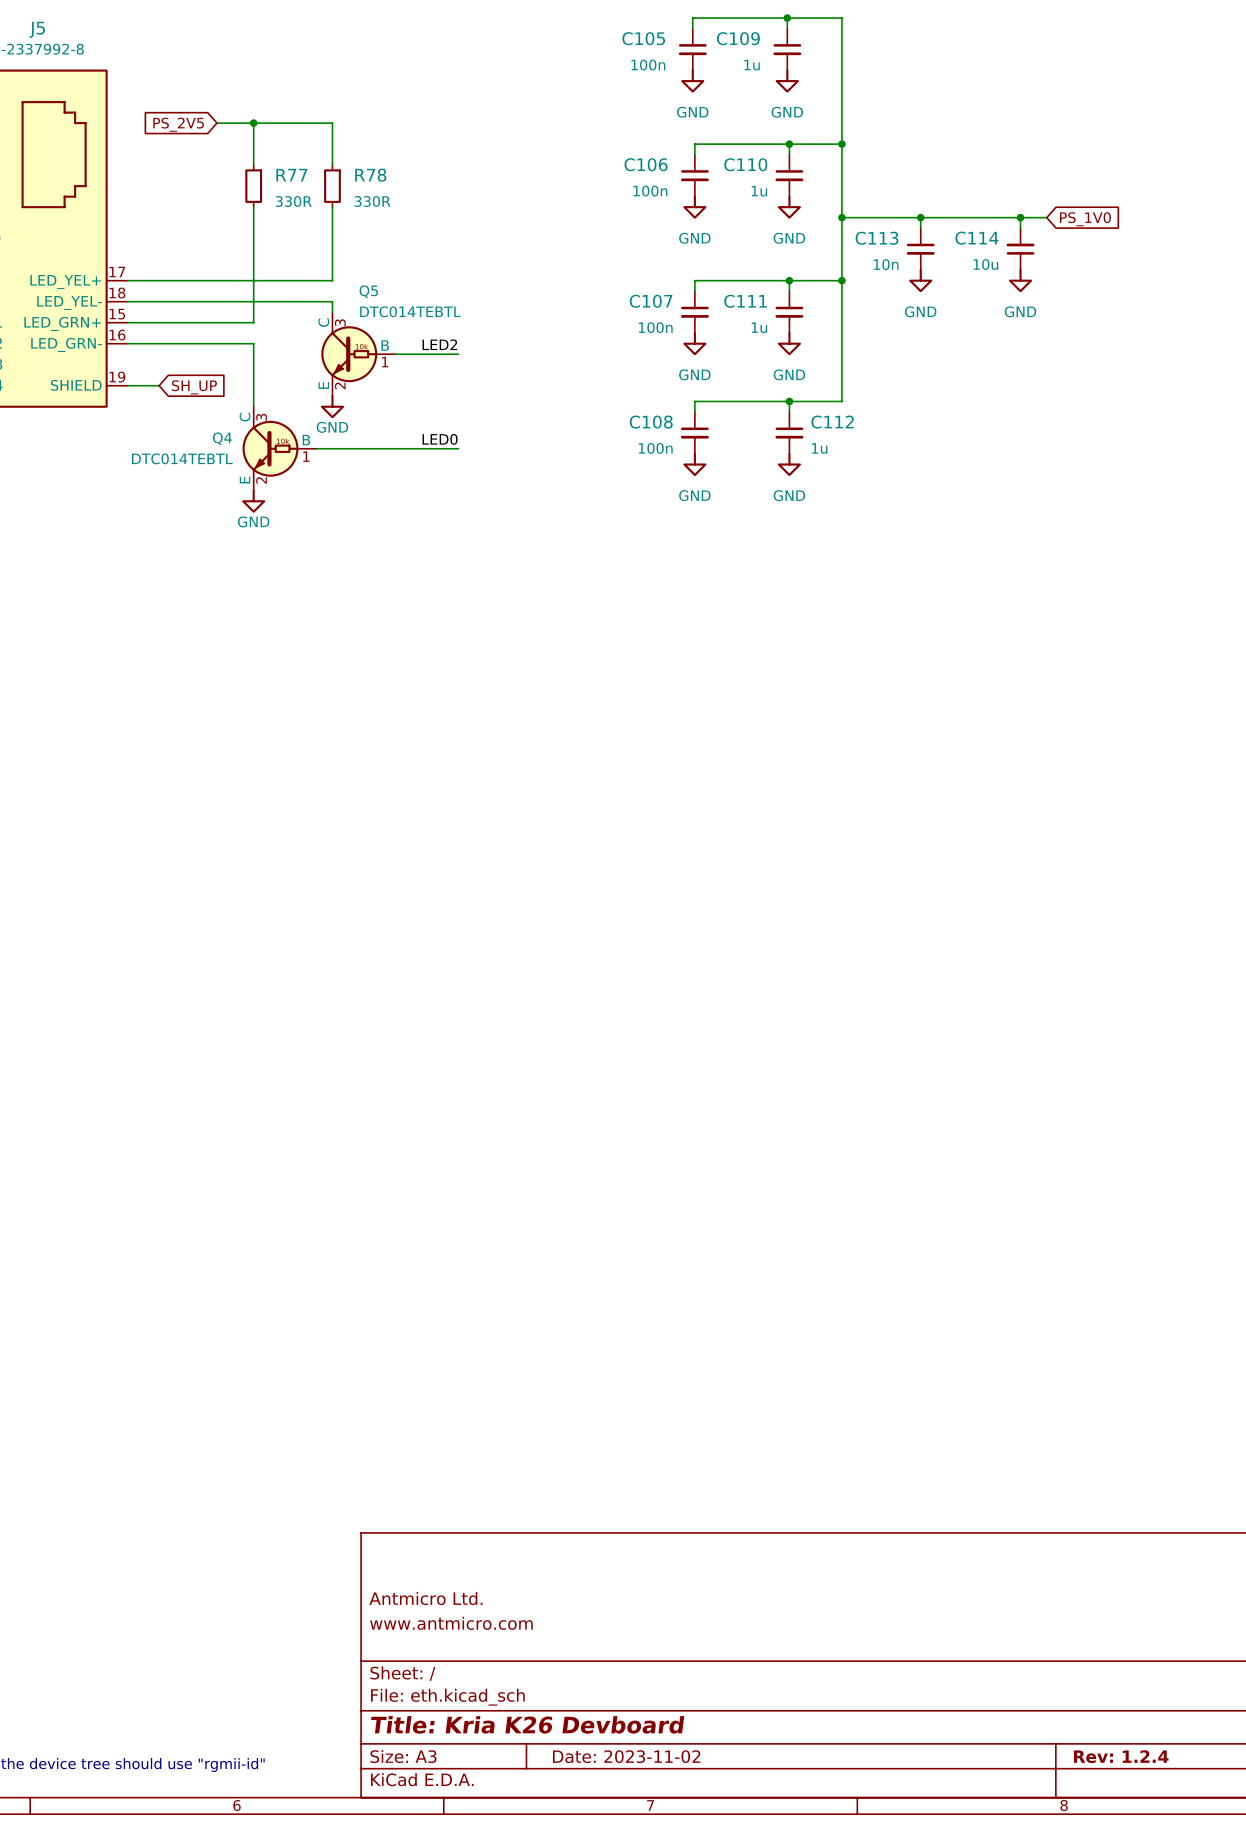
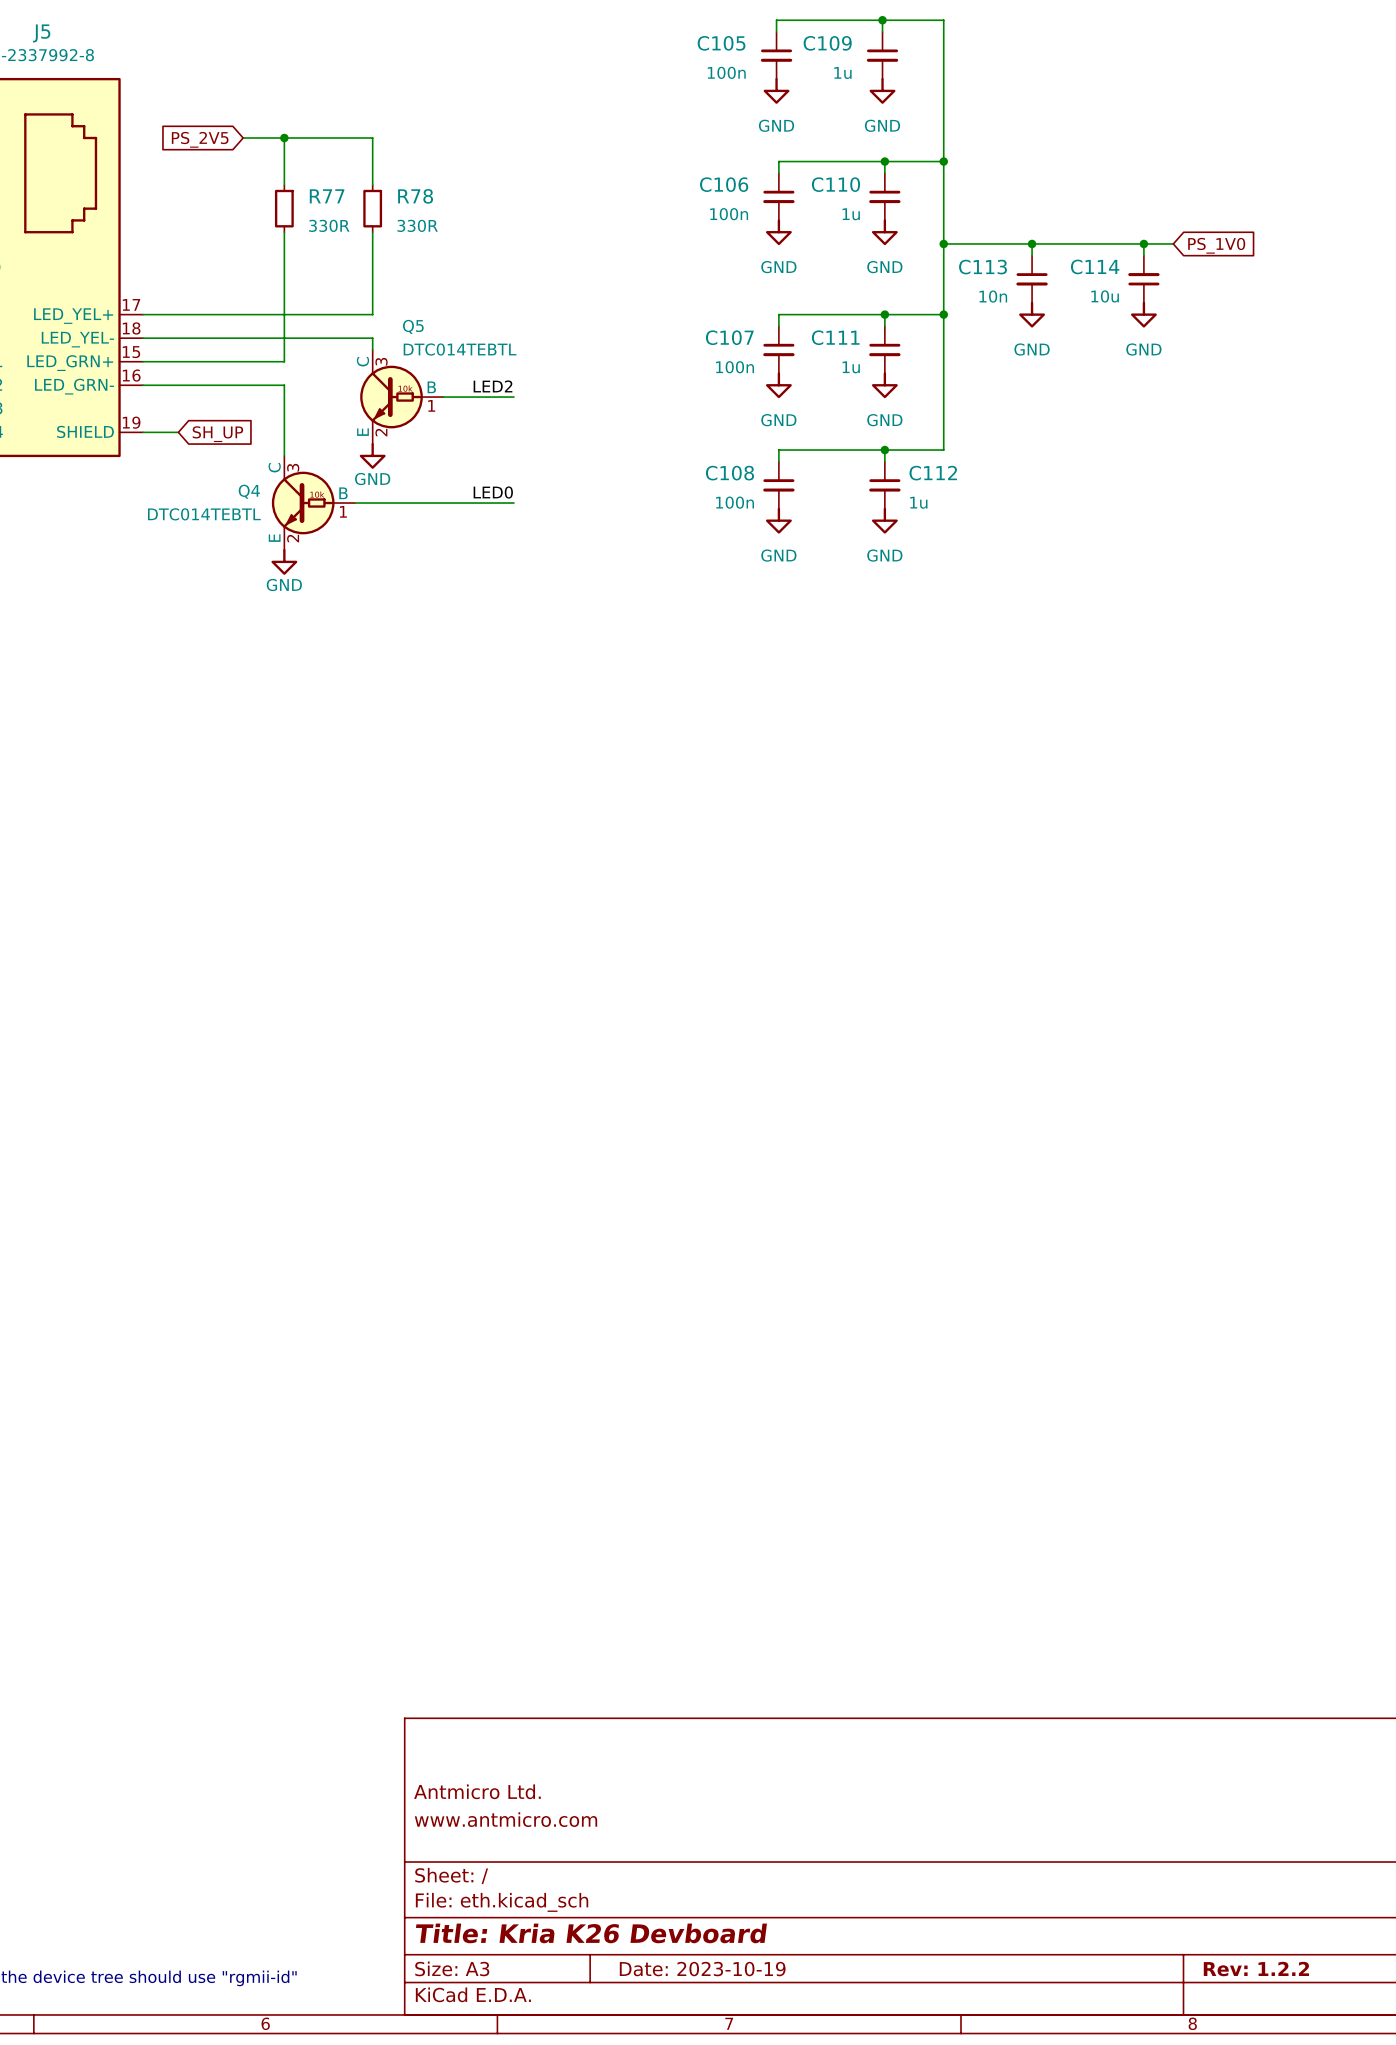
title block: Date: 2023-11-02 (626, 1756) -> Date: 2023-10-19 (702, 1969)
title block: Rev: 1.2.4 (1121, 1756) -> Rev: 1.2.2 (1256, 1969)

